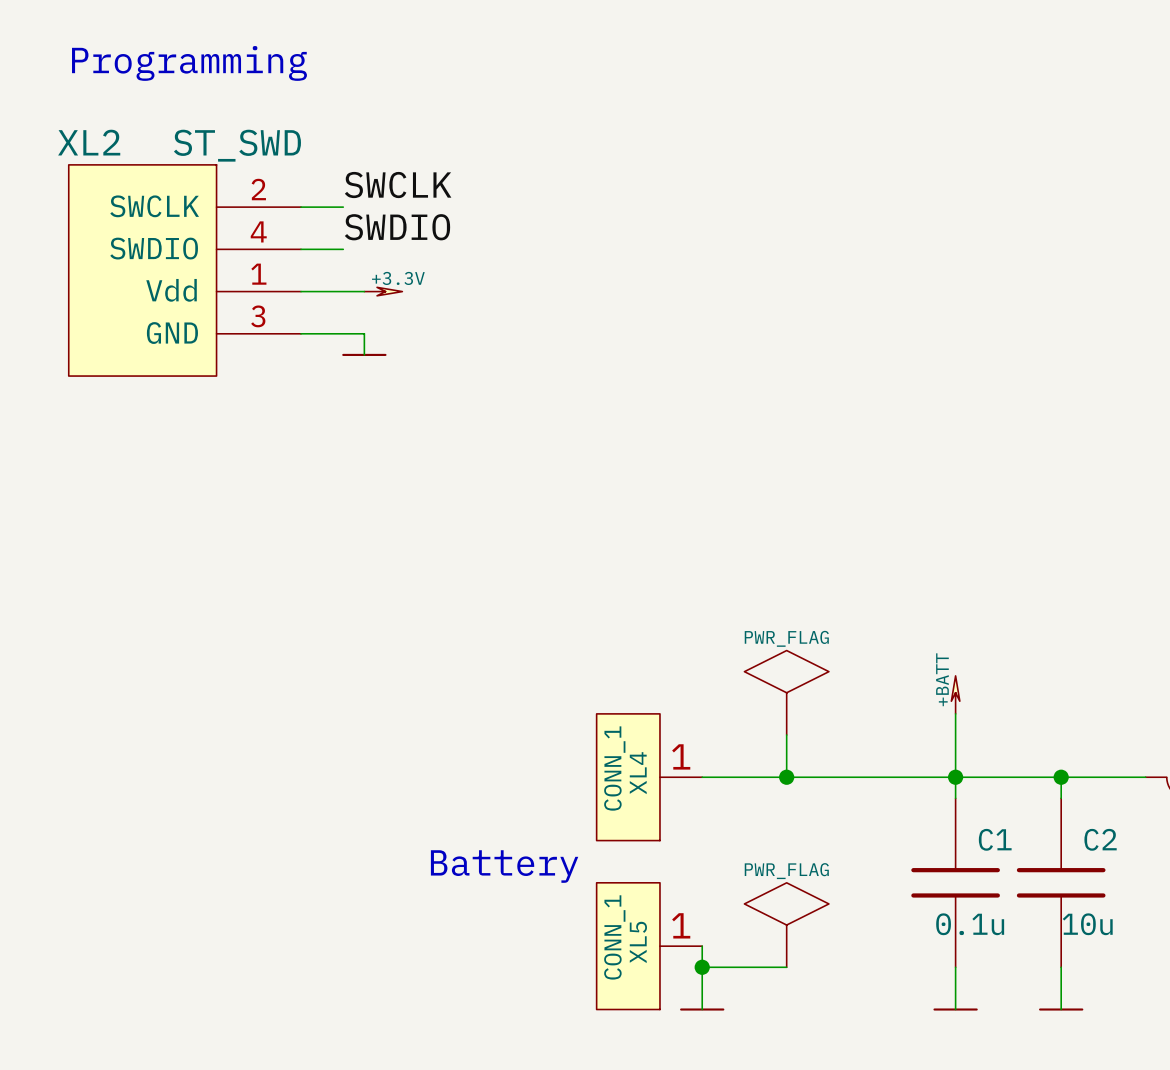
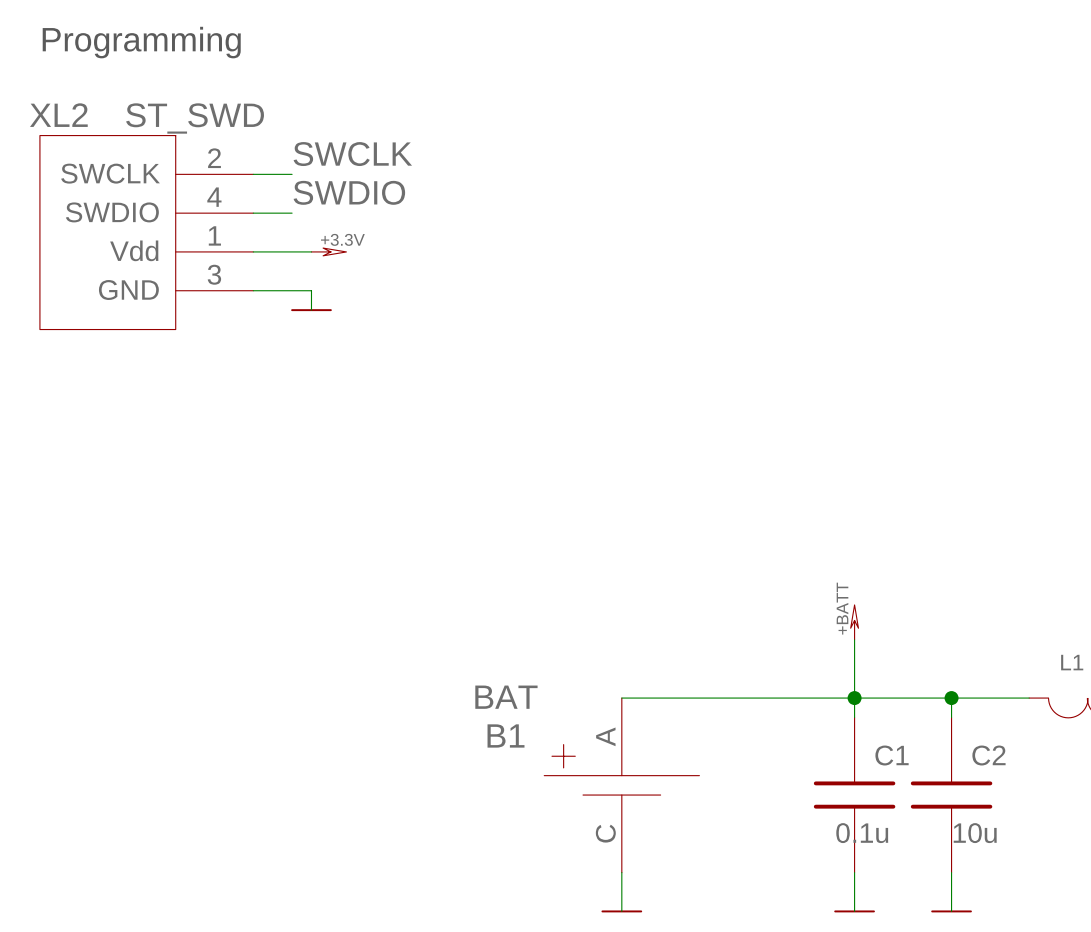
power symbol: PWR_FLAG (786, 692) -> none
wire: (786, 735) (786, 777) -> none
XL4: CONN_1 (649, 777) -> none
junction: (786, 777) -> none
text: Battery (504, 866) -> none
B1: none -> BAT (621, 785)
power symbol: PWR_FLAG (786, 925) -> none
XL5: CONN_1 (649, 946) -> none
wire: (702, 946) (702, 967) (786, 967) -> none
junction: (702, 967) -> none

